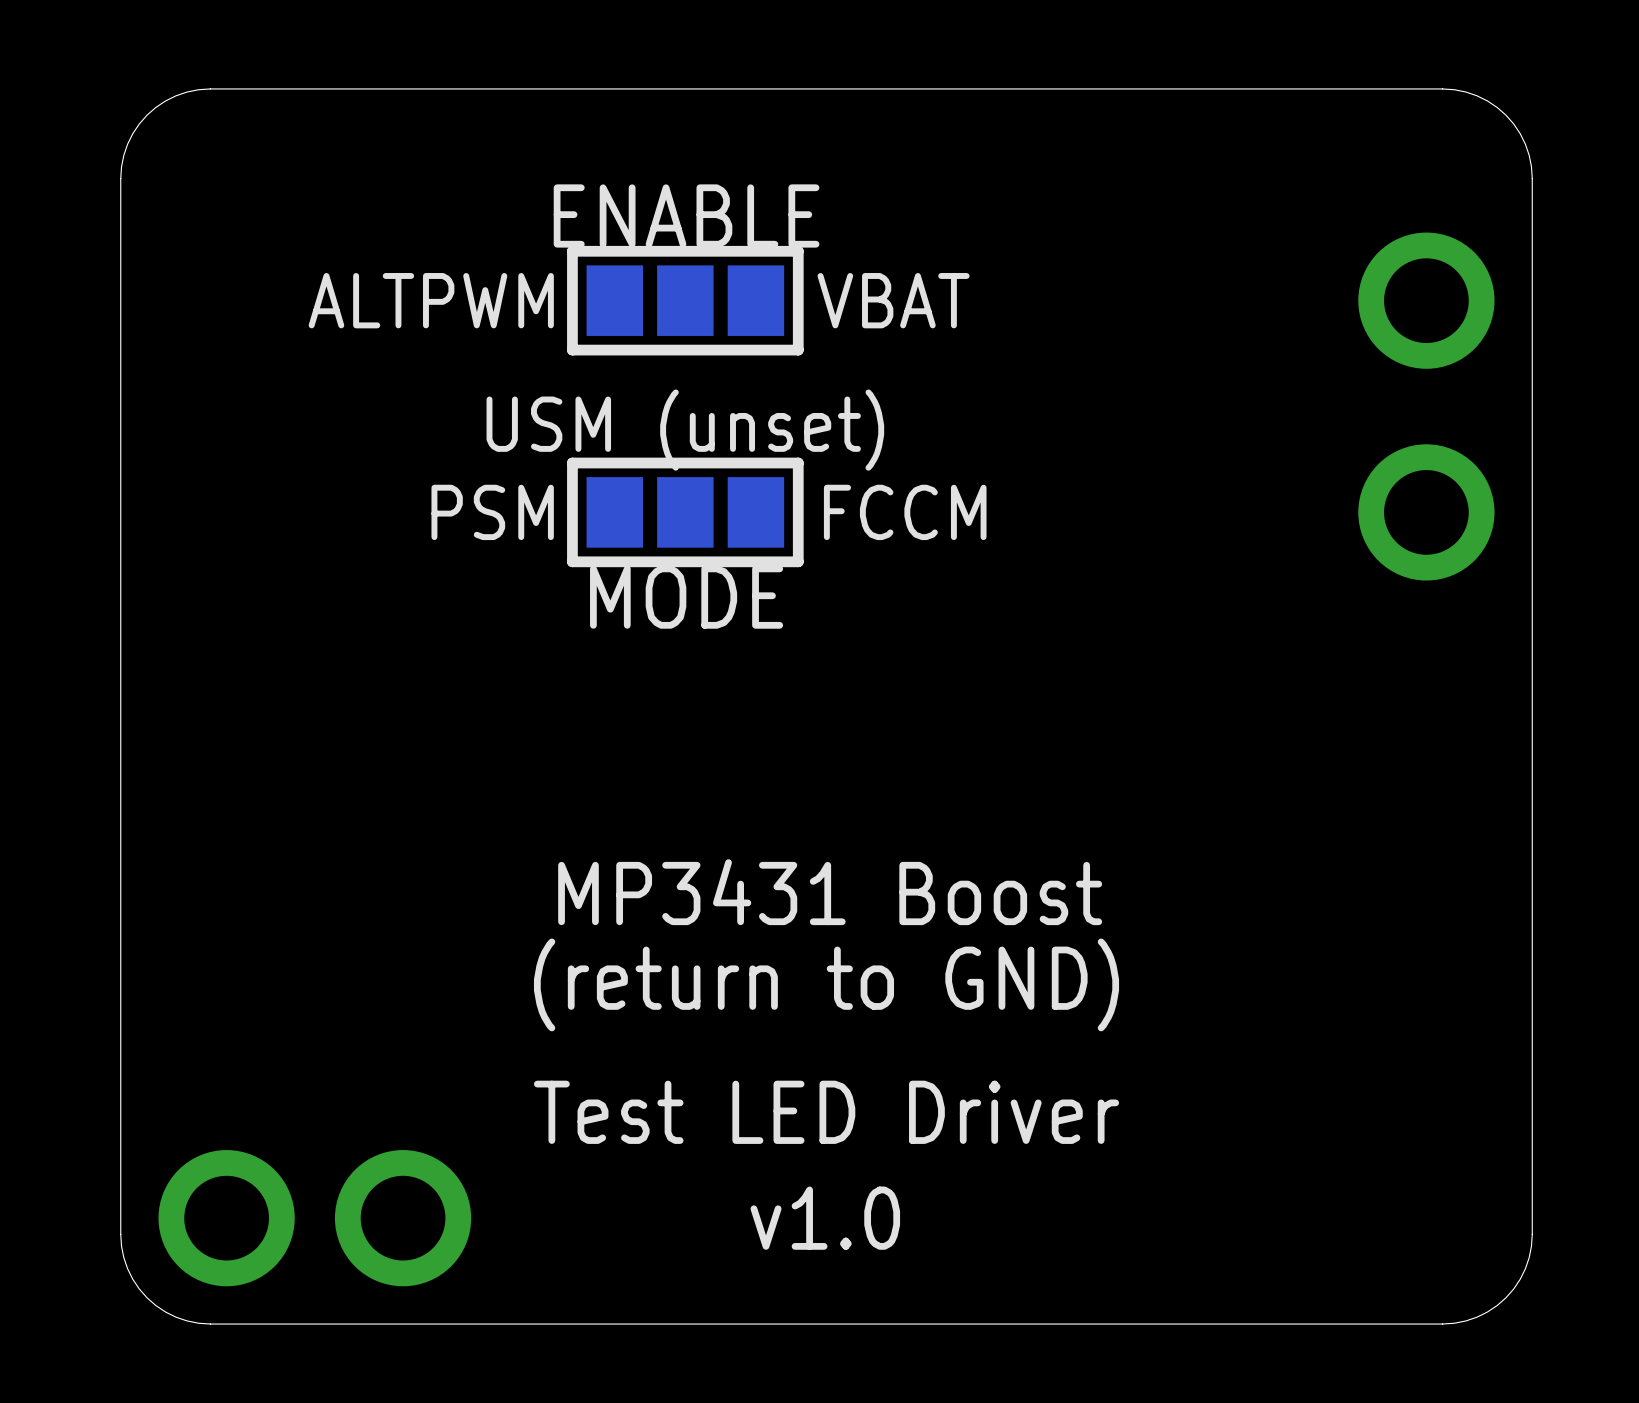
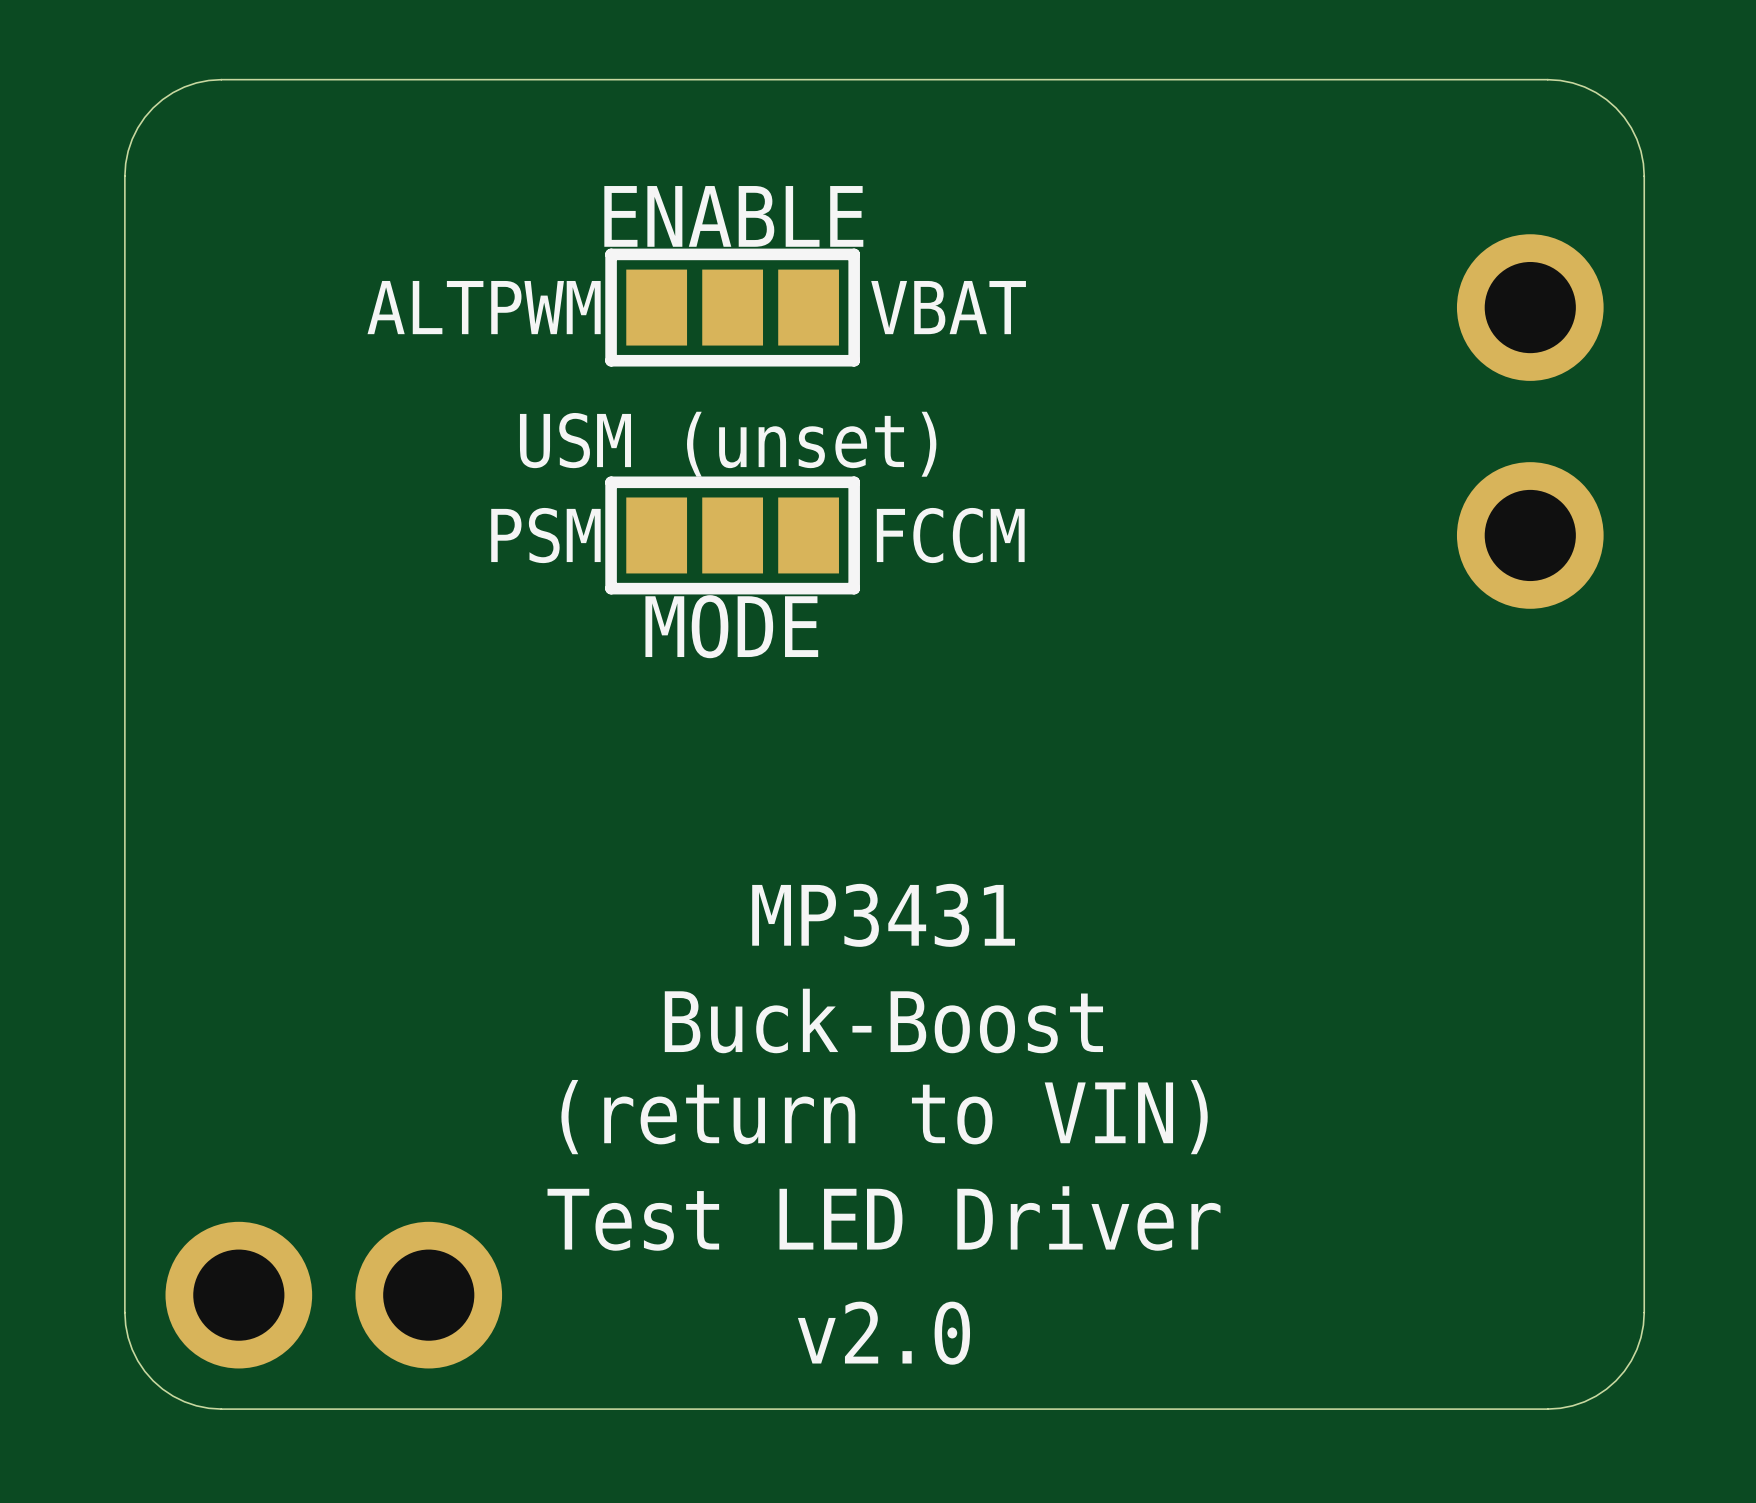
text: MP3431 Boost (830, 892) -> MP3431 (883, 915)
text: (return to GND) (826, 984) -> Buck-Boost (883, 1020)
text: none -> (return to VIN) (884, 1117)
text position: Test LED Driver (826, 1112) -> Test LED Driver (883, 1218)
text: v1.0 (825, 1218) -> v2.0 (883, 1333)

